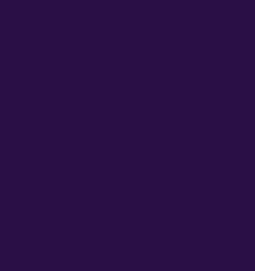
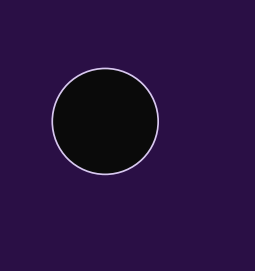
hole: none -> (105, 121)

